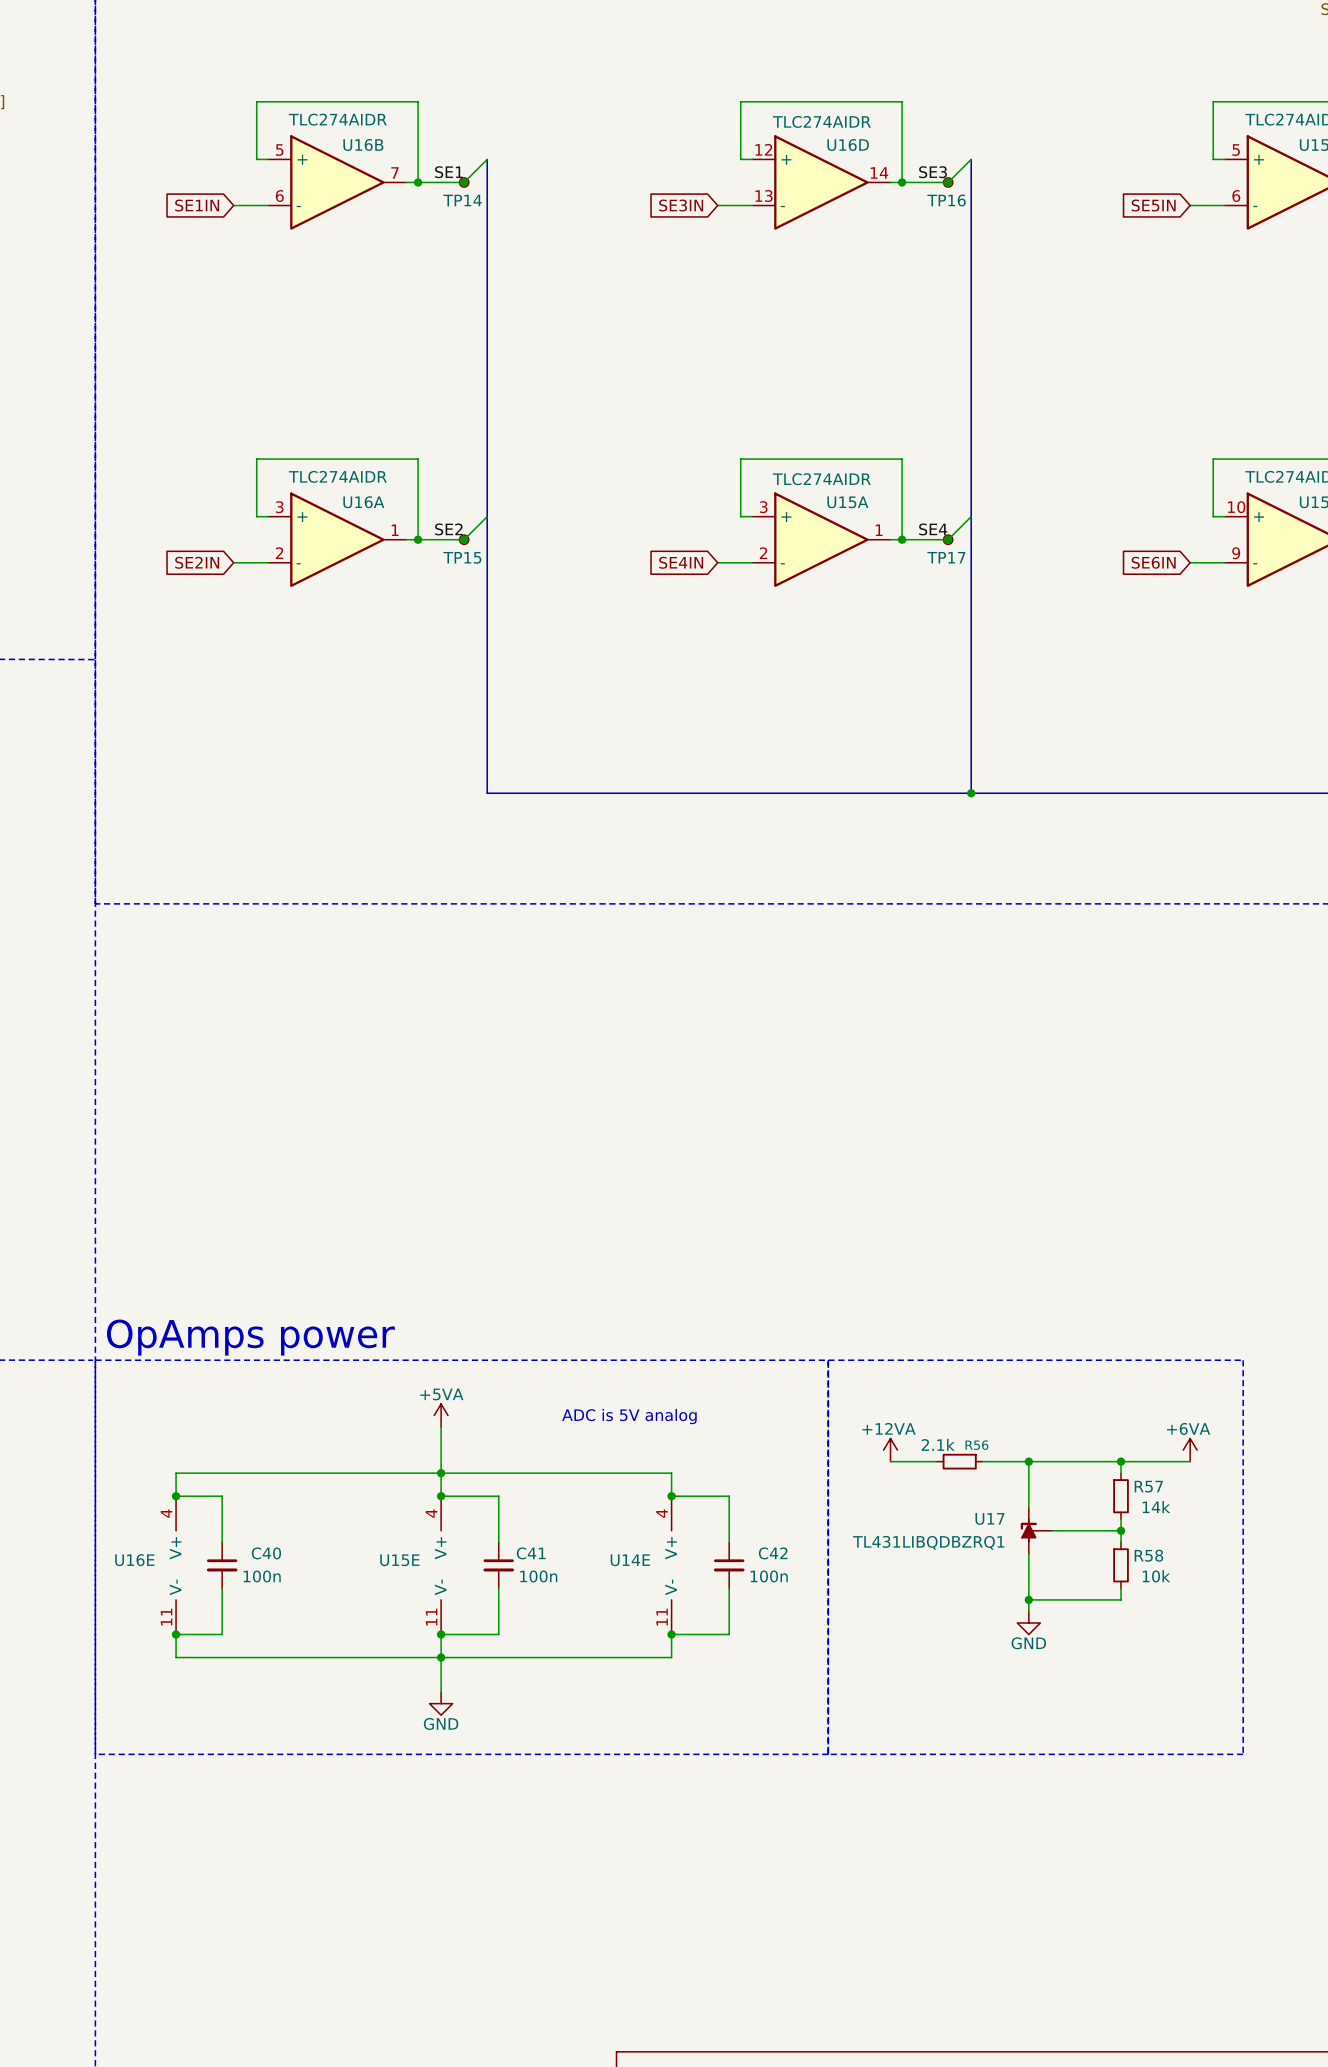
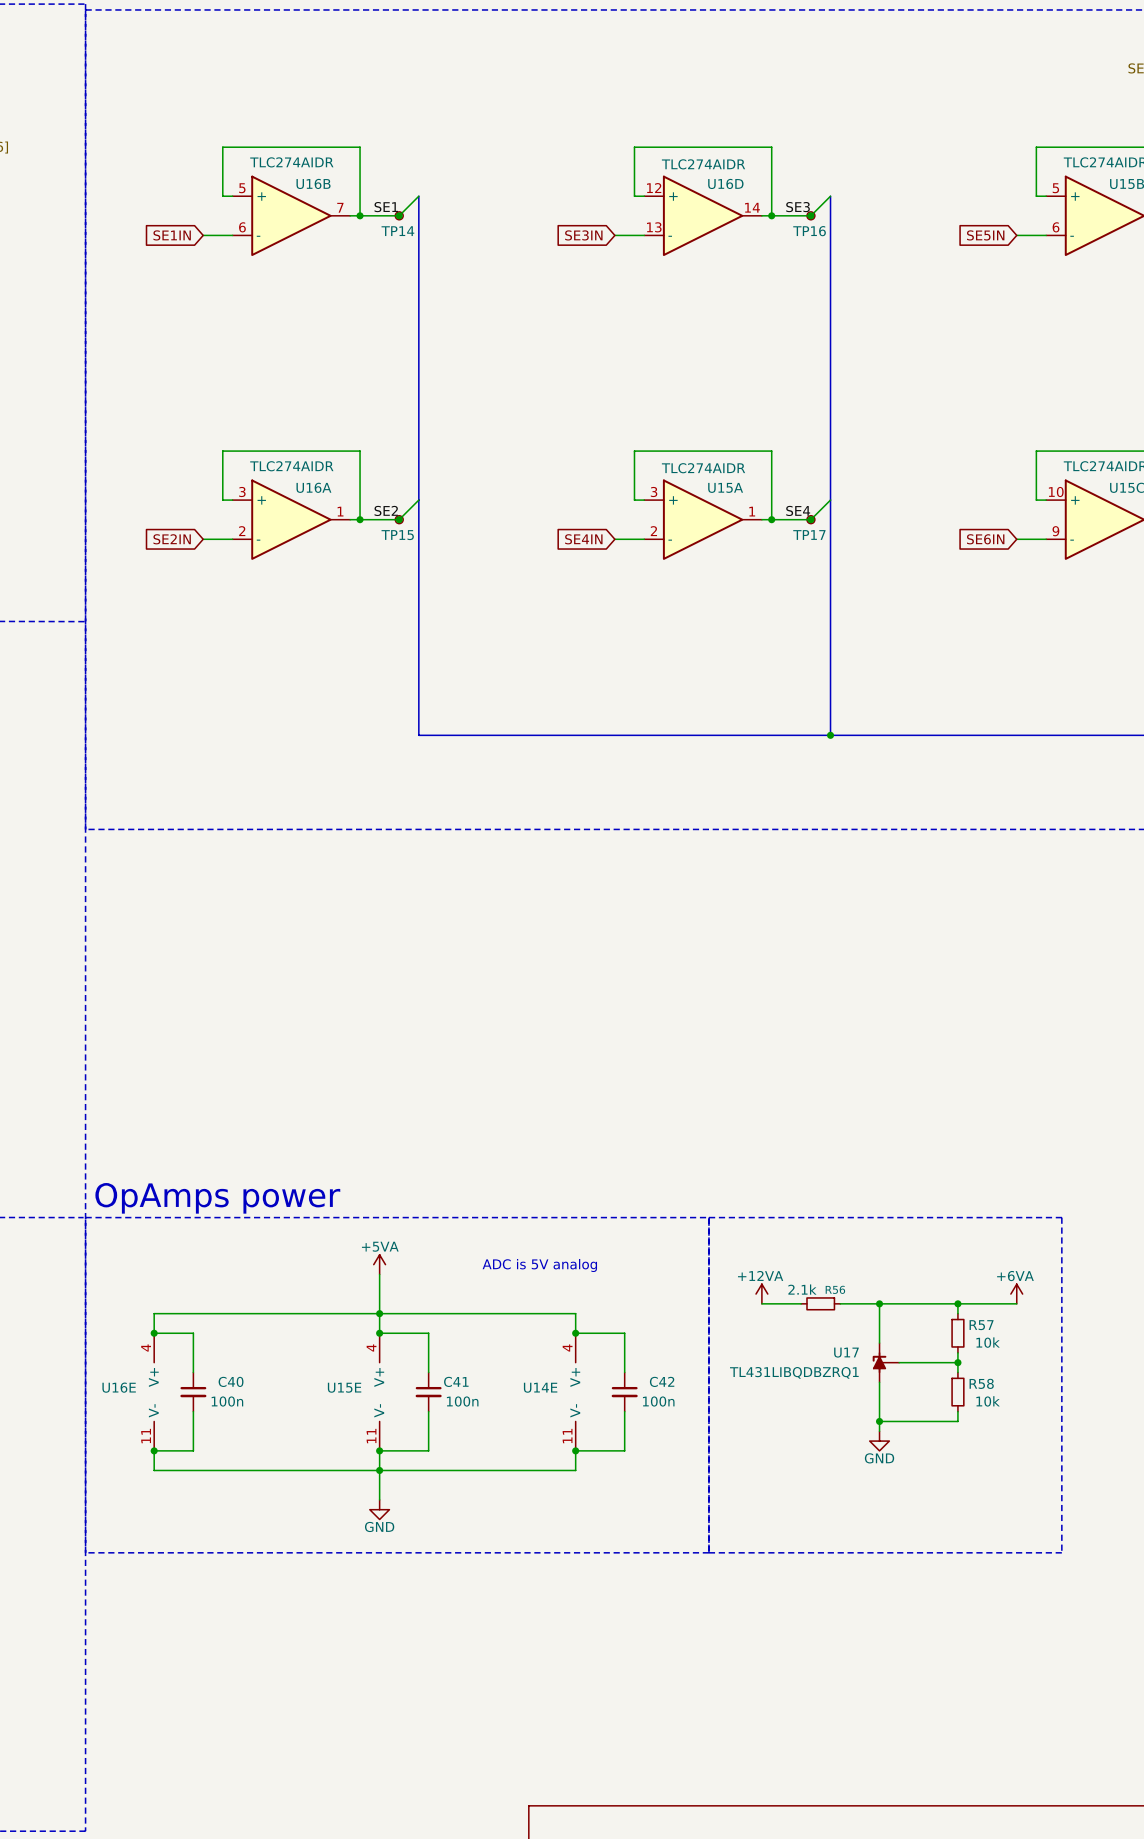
R57 value: 14k (1156, 1507) -> 10k (988, 1342)

